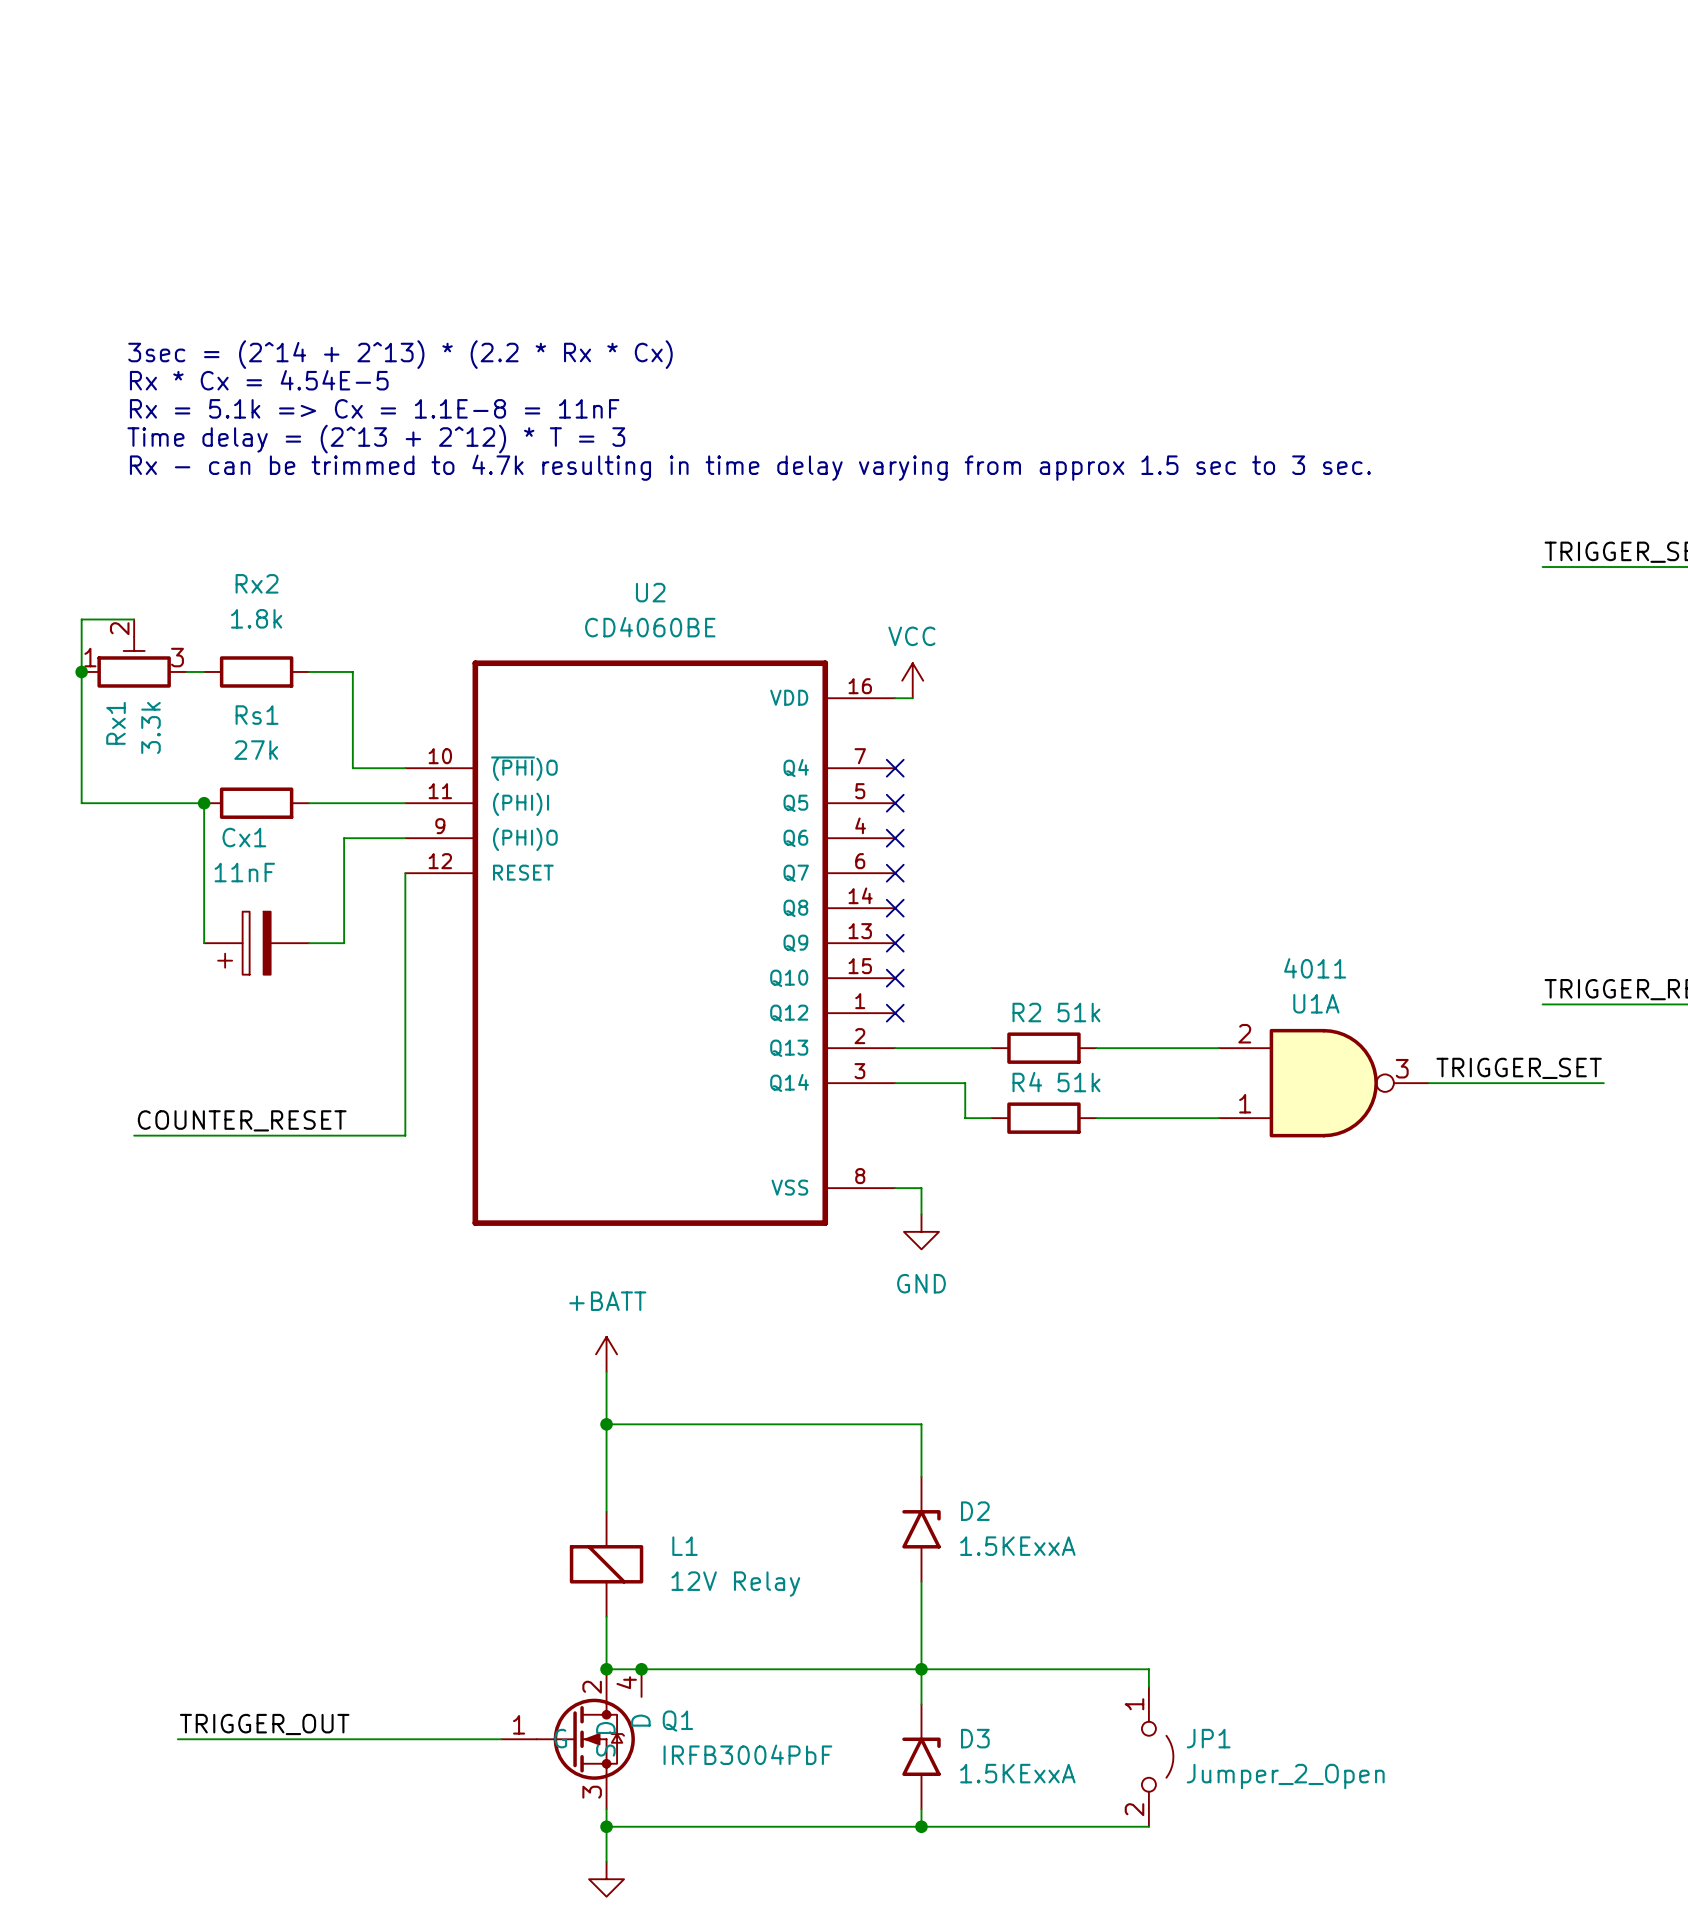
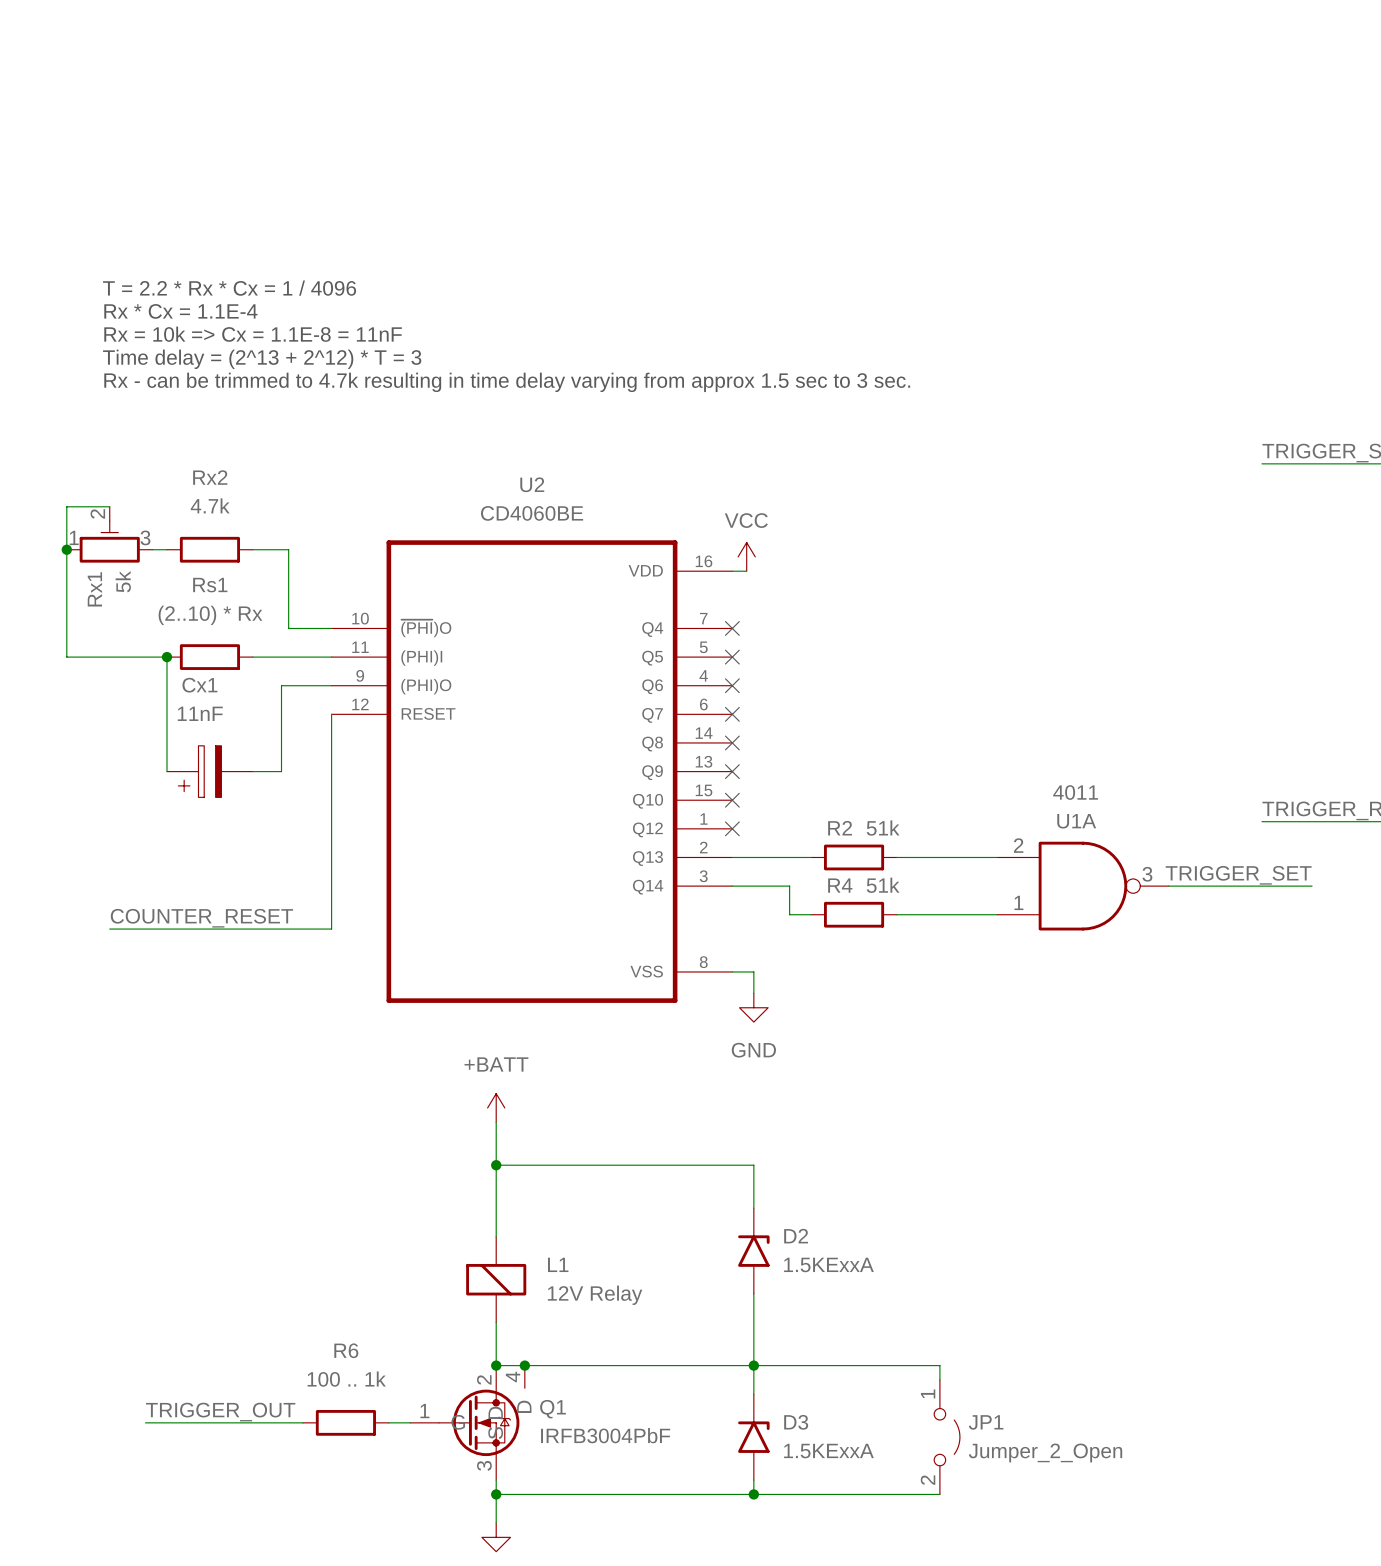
text: 3sec = (2^14 + 2^13) * (2.2 * Rx * Cx) (400, 354) -> T = 2.2 * Rx * Cx = 1 / 4096 (229, 288)
text: Rx * Cx = 4.54E-5 (259, 380) -> Rx * Cx = 1.1E-4 (180, 311)
text: Rx = 5.1k => Cx = 1.1E-8 = 11nF (374, 408) -> Rx = 10k => Cx = 1.1E-8 = 11nF (253, 334)
Rx2 value: 1.8k (256, 618) -> 4.7k (210, 505)
Rx1 value: 3.3k (150, 727) -> 5k (123, 581)
Rs1 value: 27k (256, 750) -> (2..10) * Rx (210, 615)
wire: (370, 1739) (475, 1739) -> none
R6: none -> 100 .. 1k (345, 1422)

